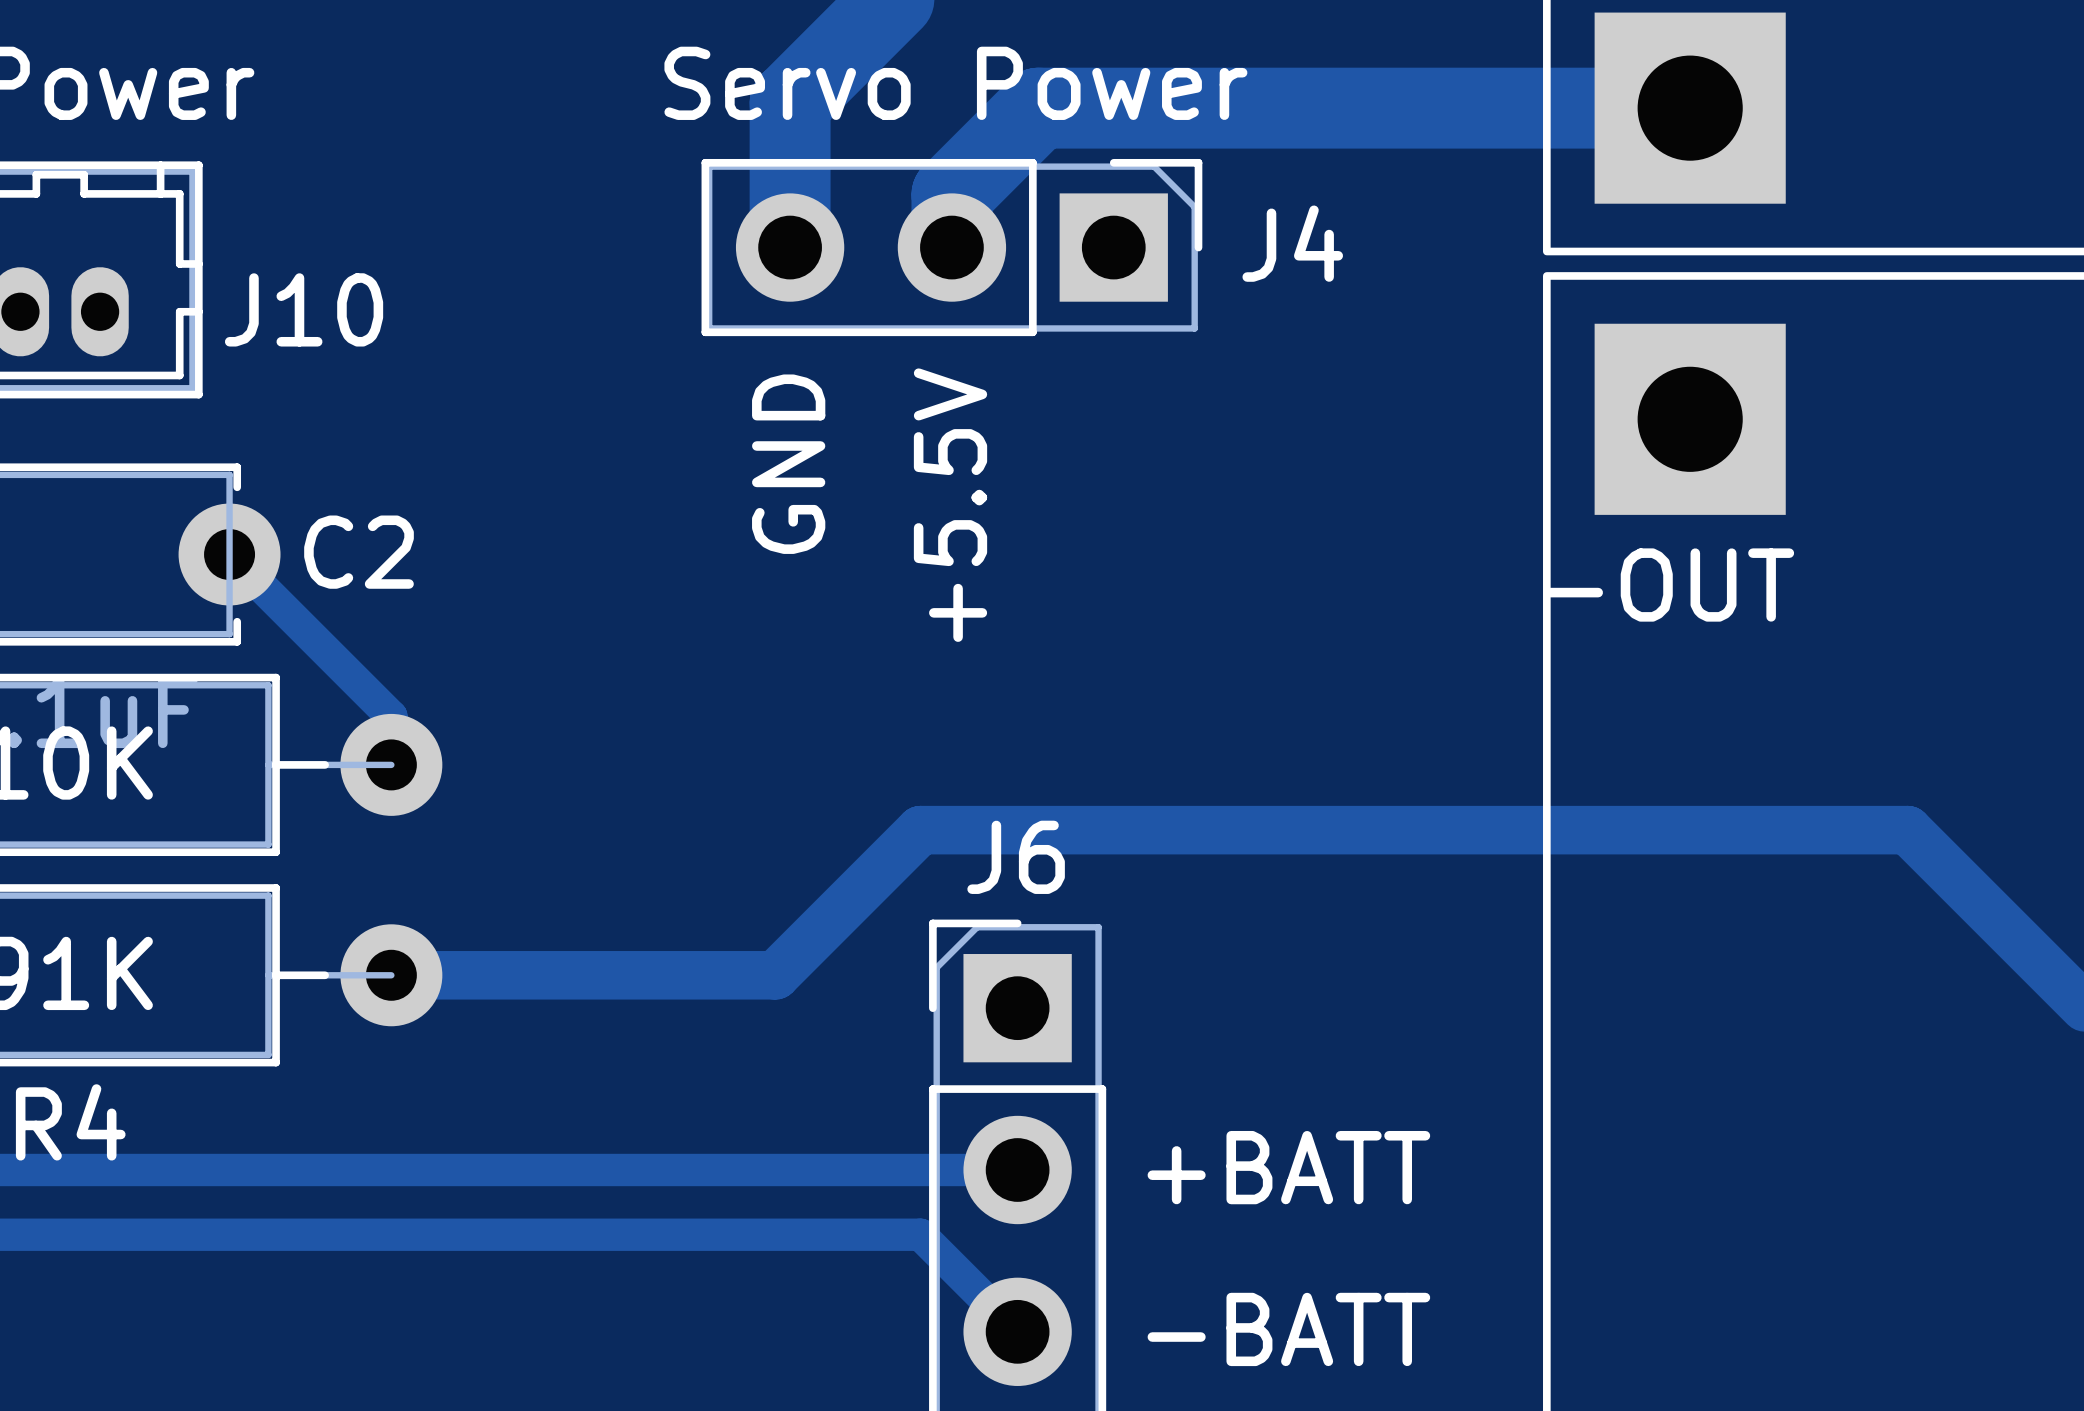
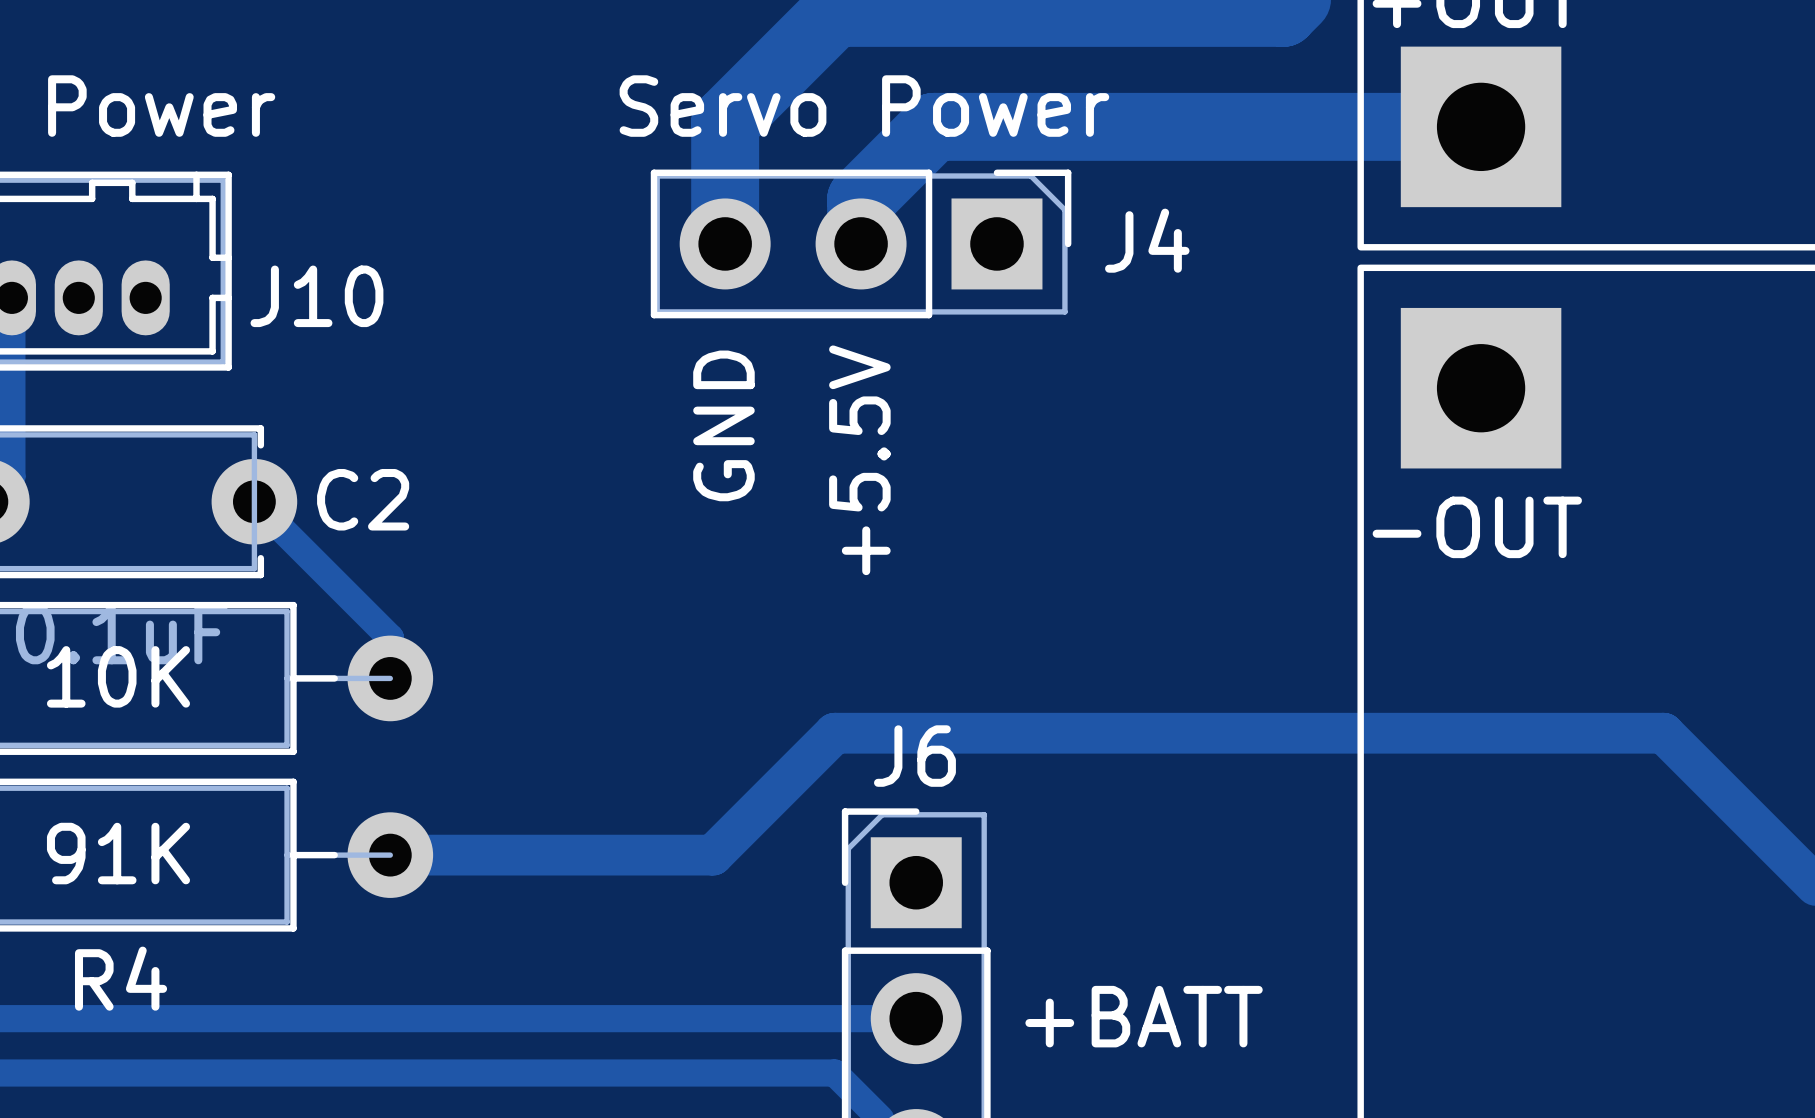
part text position: -OUT (1669, 585) -> -OUT (1477, 527)

